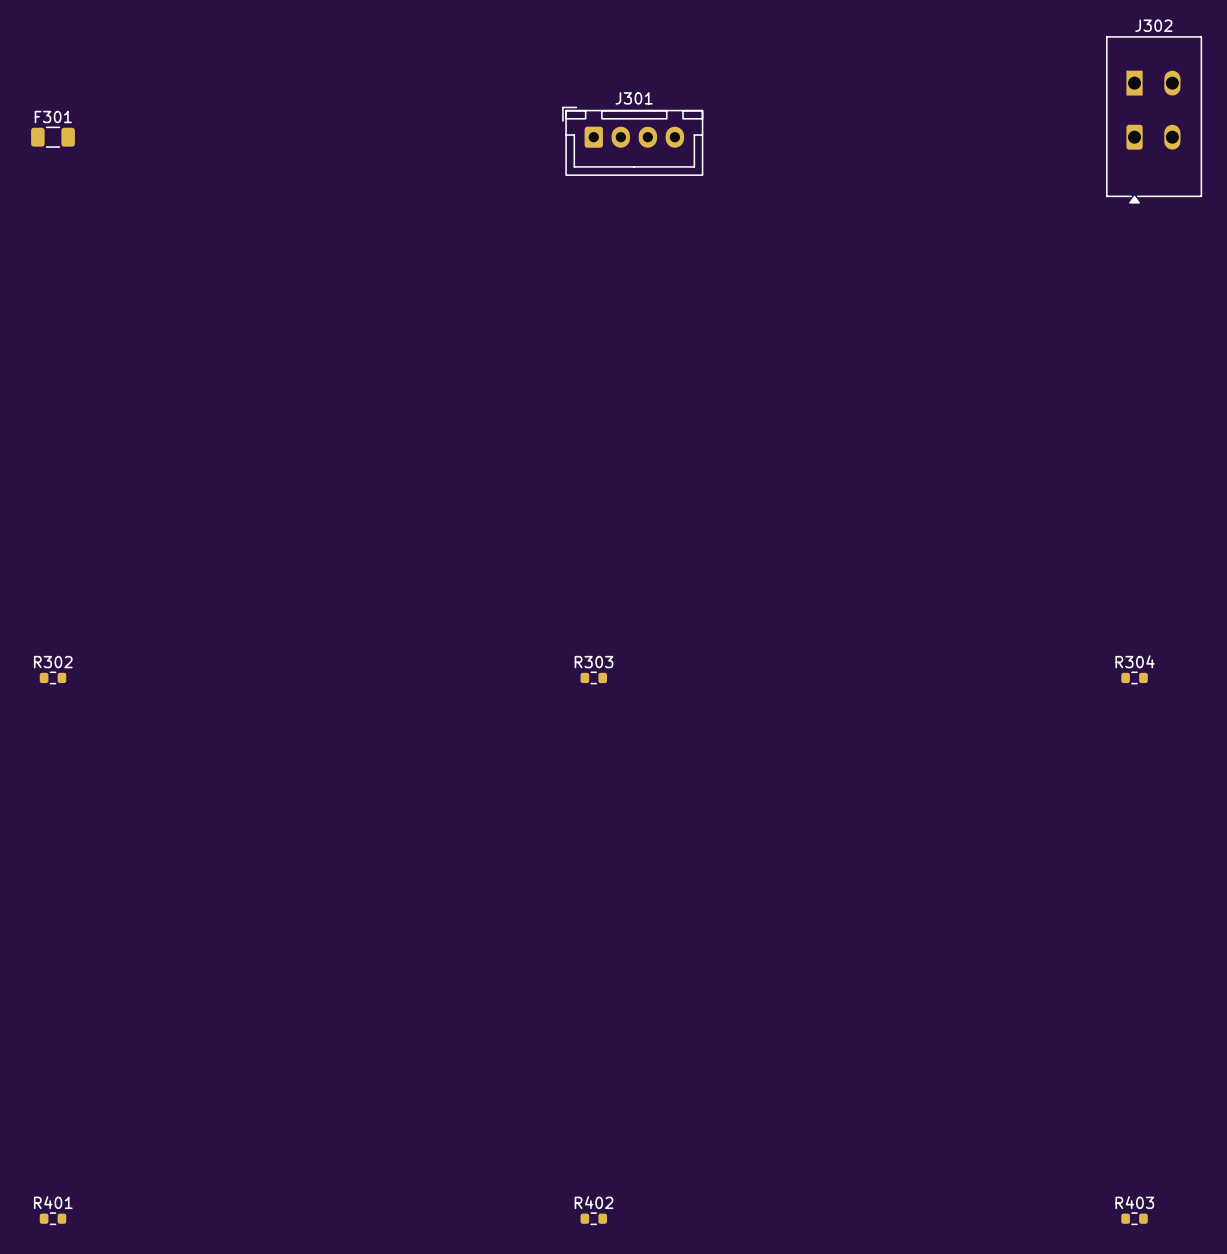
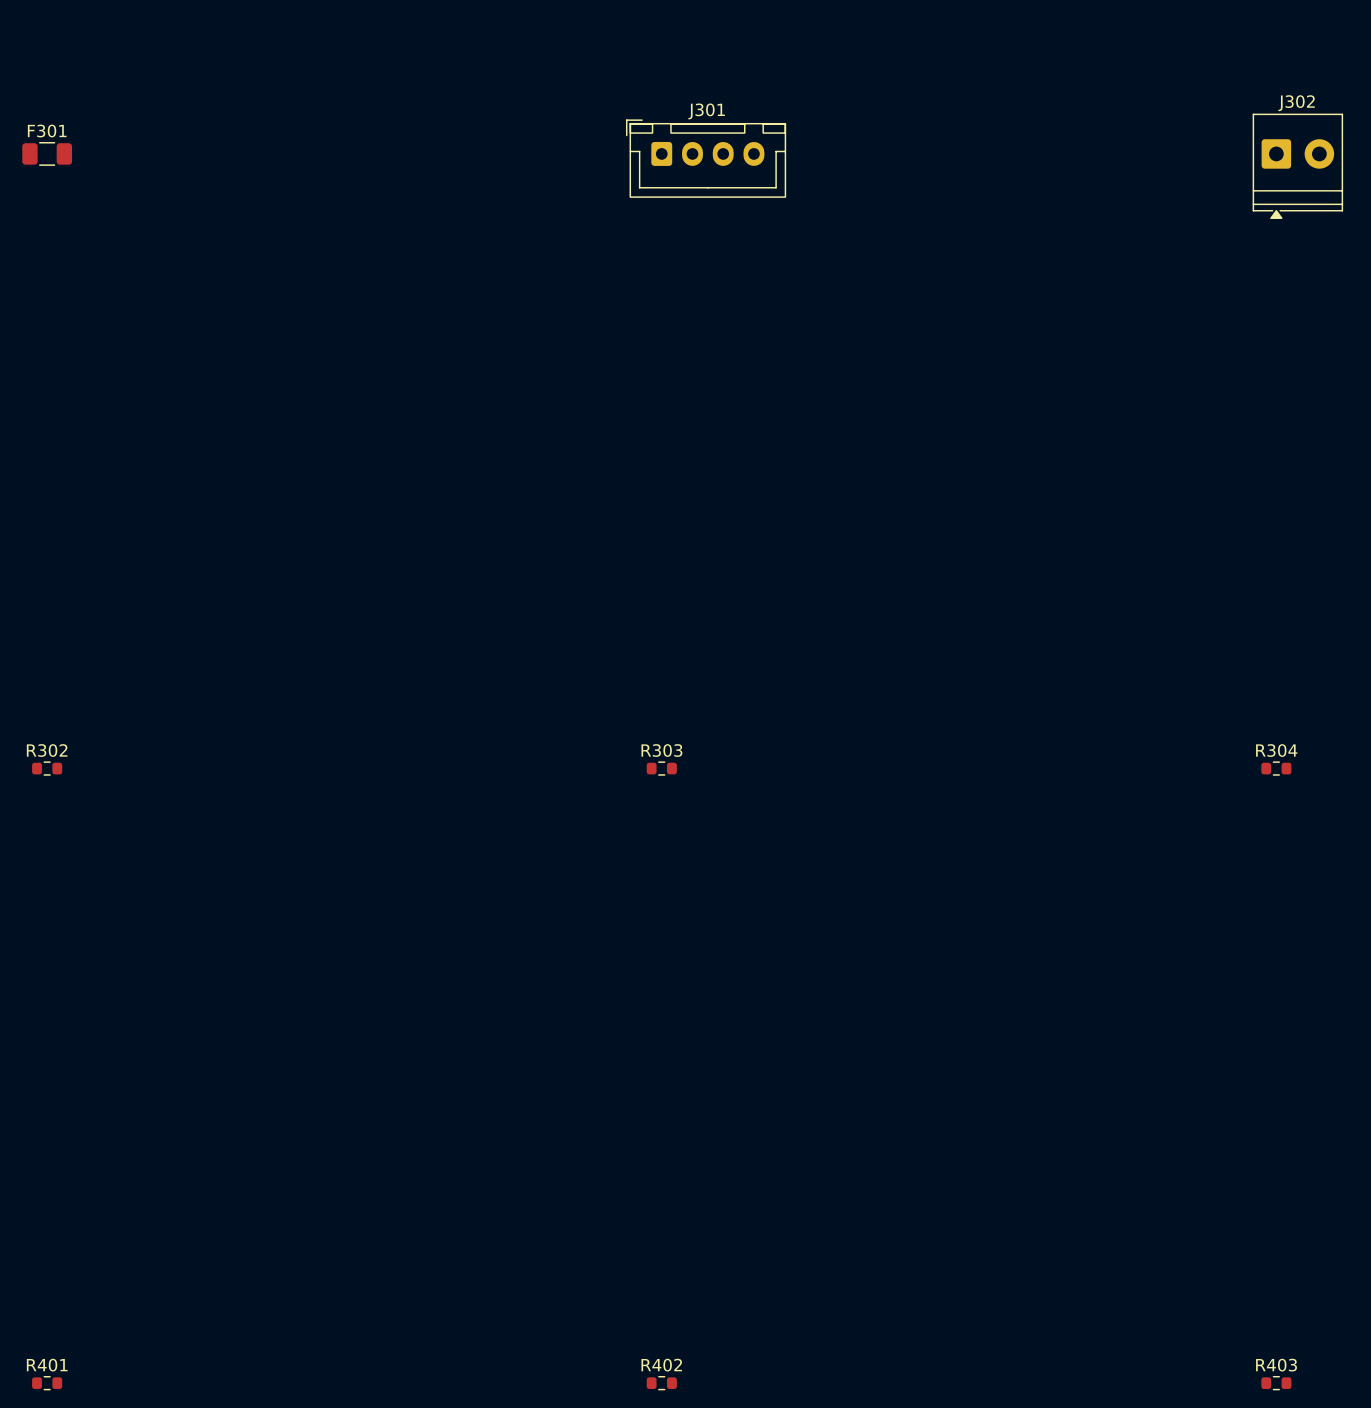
J302 name position: J302 (1153, 25) -> J302 (1296, 103)
J302 footprint: [1106, 36, 1203, 204] -> [1252, 113, 1344, 219]

